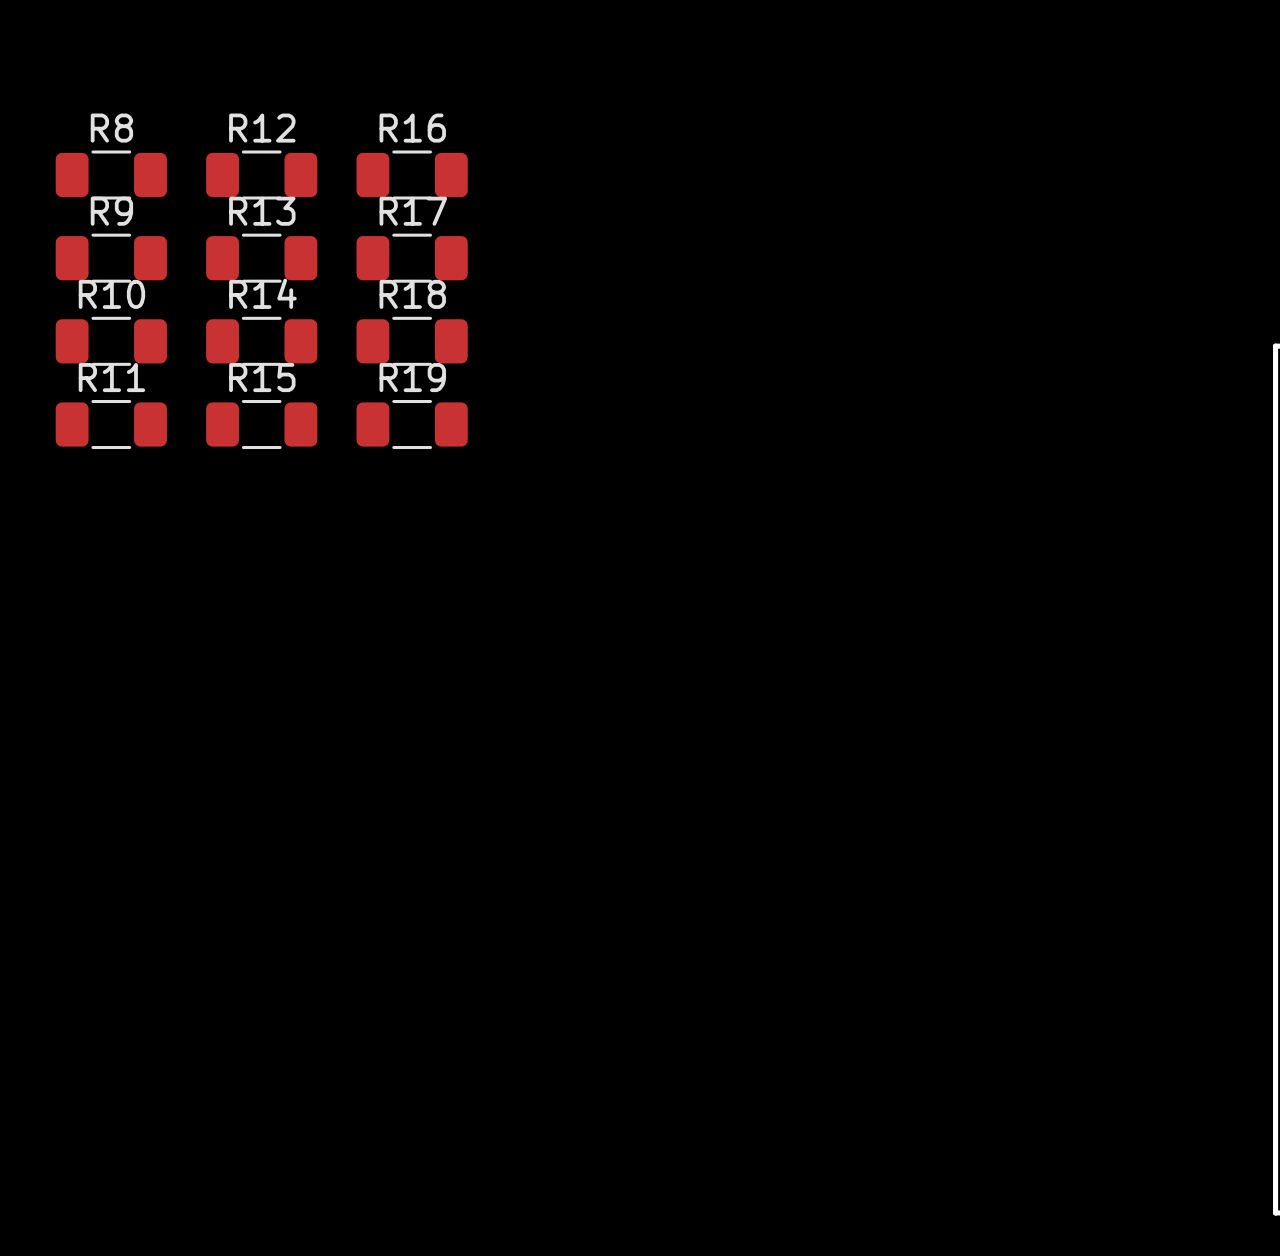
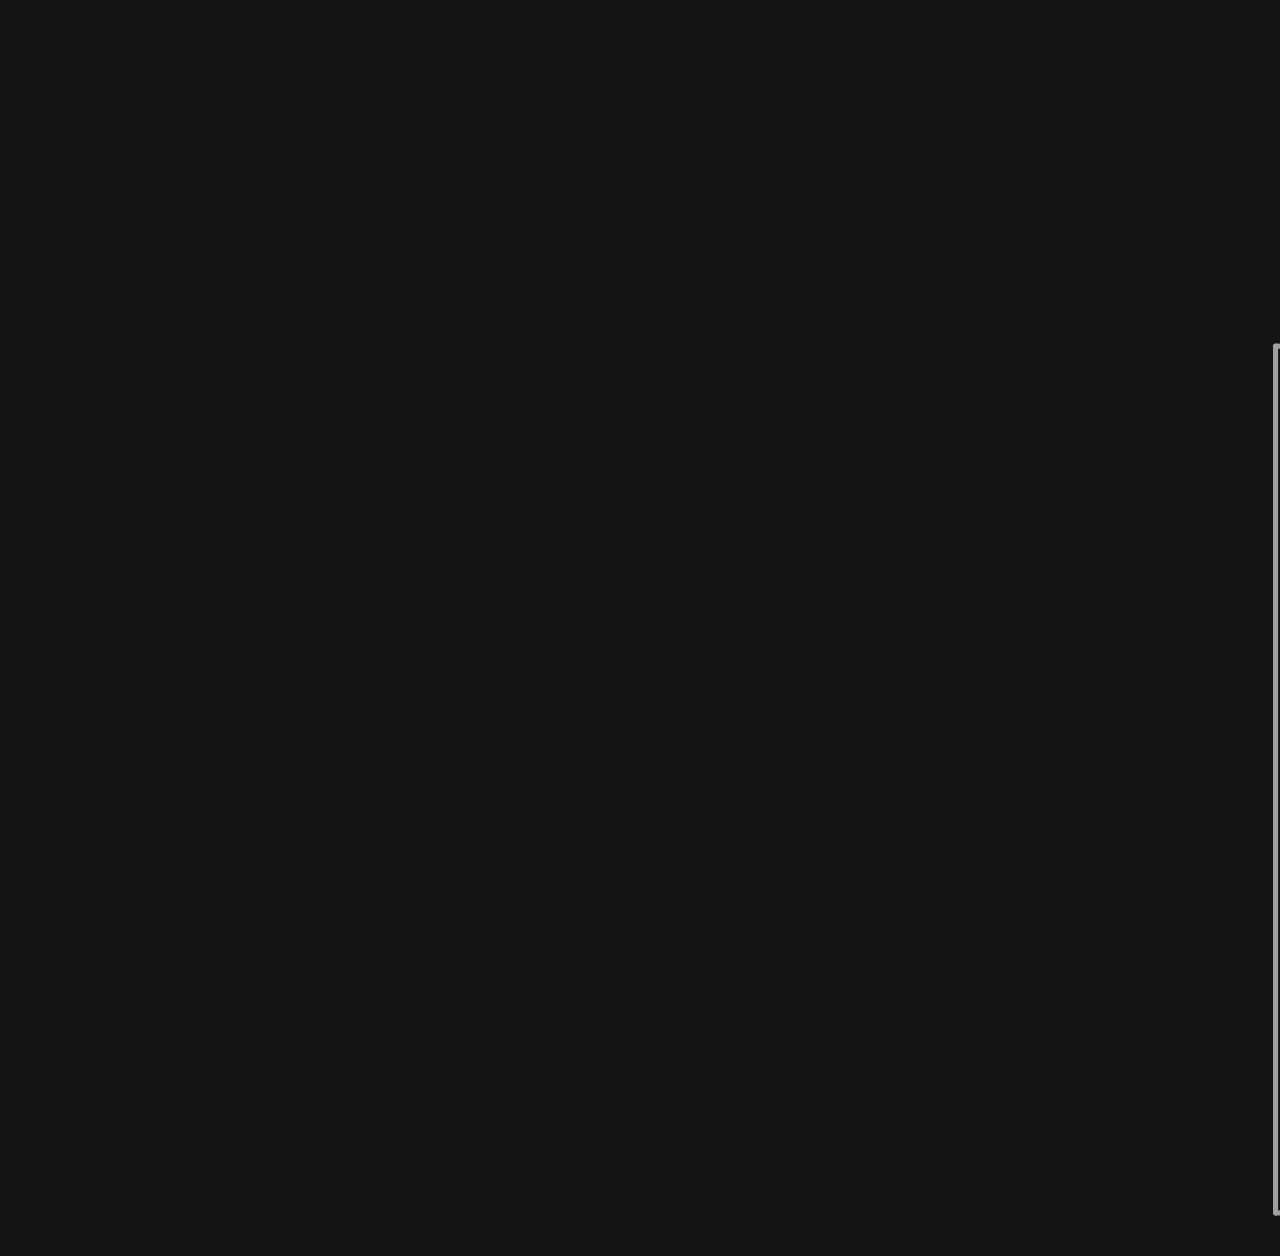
R8: (111, 175) -> none
R12: (261, 175) -> none
R16: (412, 175) -> none
R9: (111, 258) -> none
R13: (261, 258) -> none
R17: (412, 258) -> none
R10: (111, 341) -> none
R14: (261, 341) -> none
R18: (412, 341) -> none
R11: (111, 424) -> none
R15: (261, 424) -> none
R19: (412, 424) -> none

